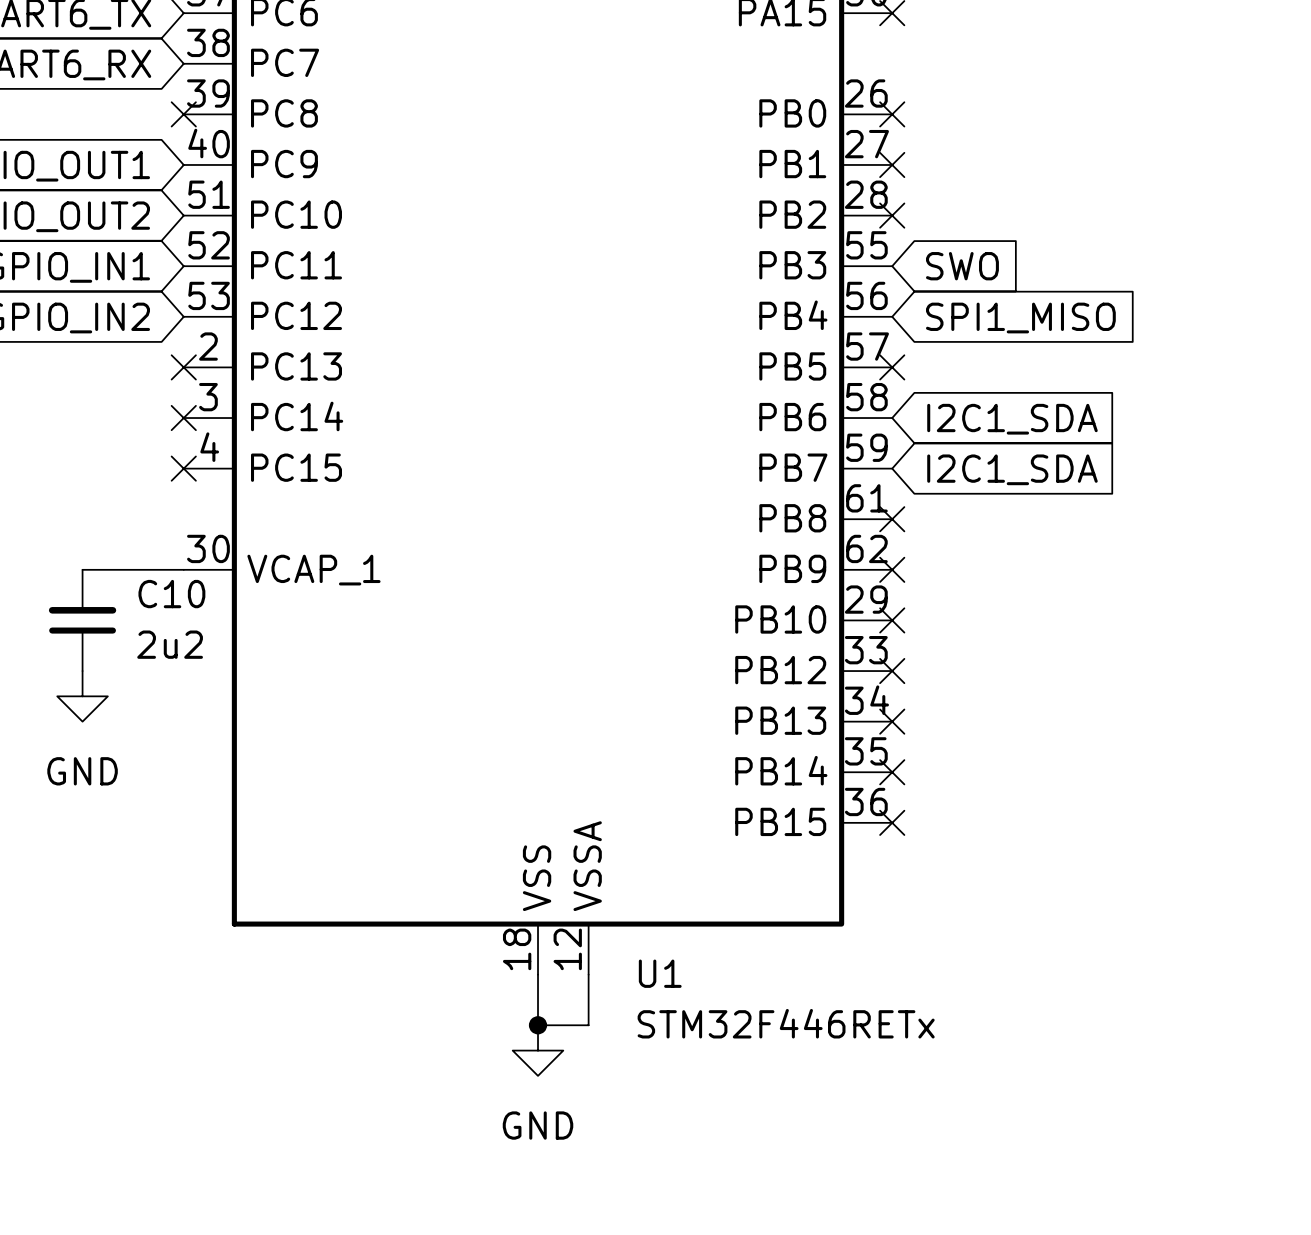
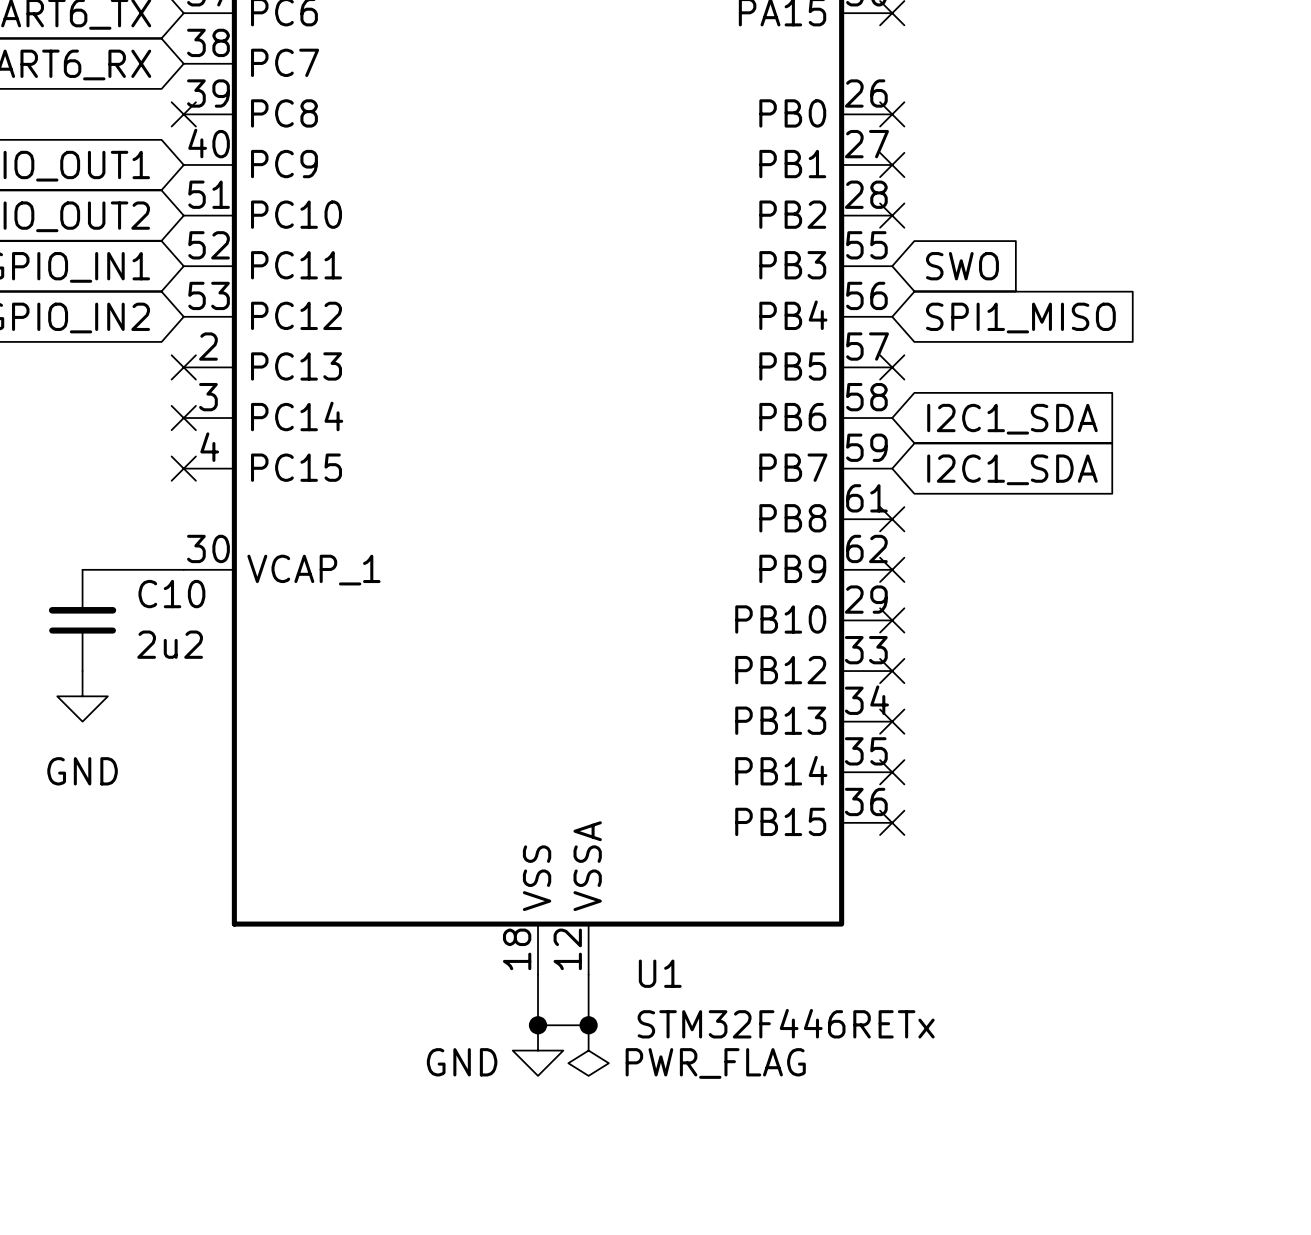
junction: none -> (588, 1025)
power symbol: none -> PWR_FLAG (588, 1050)
power symbol text position: GND (538, 1125) -> GND (462, 1062)

